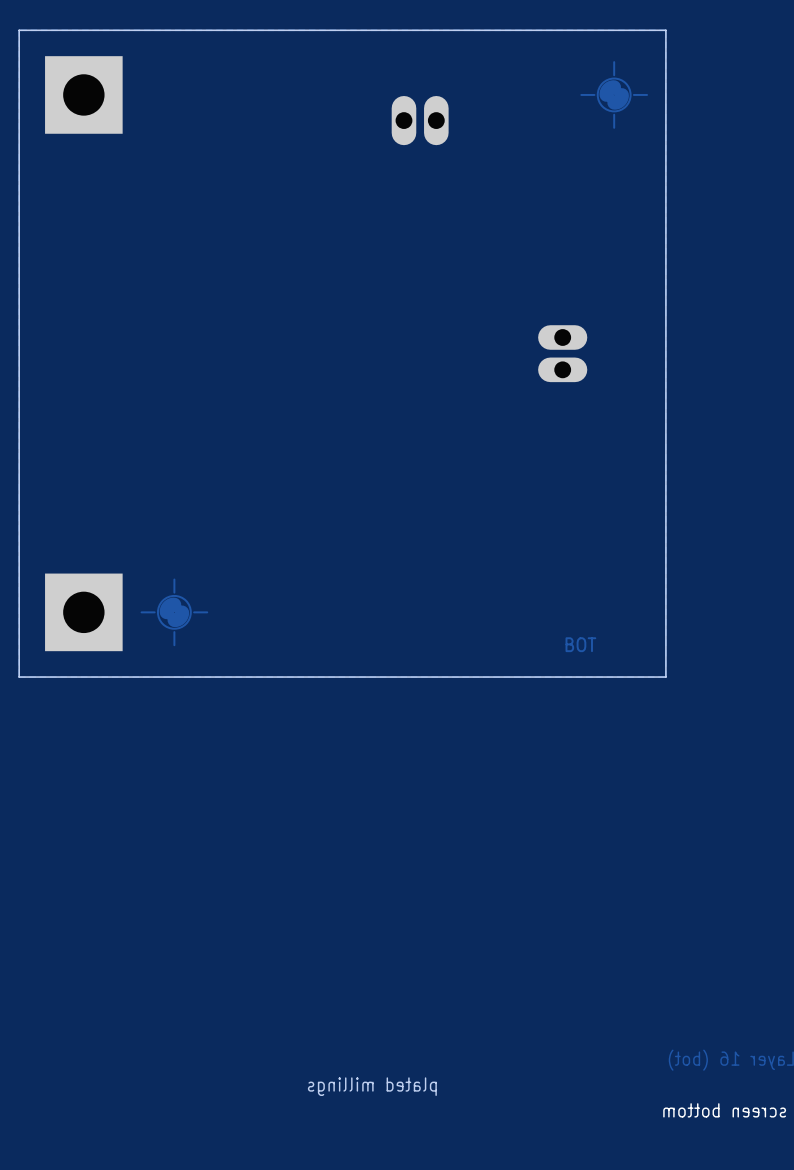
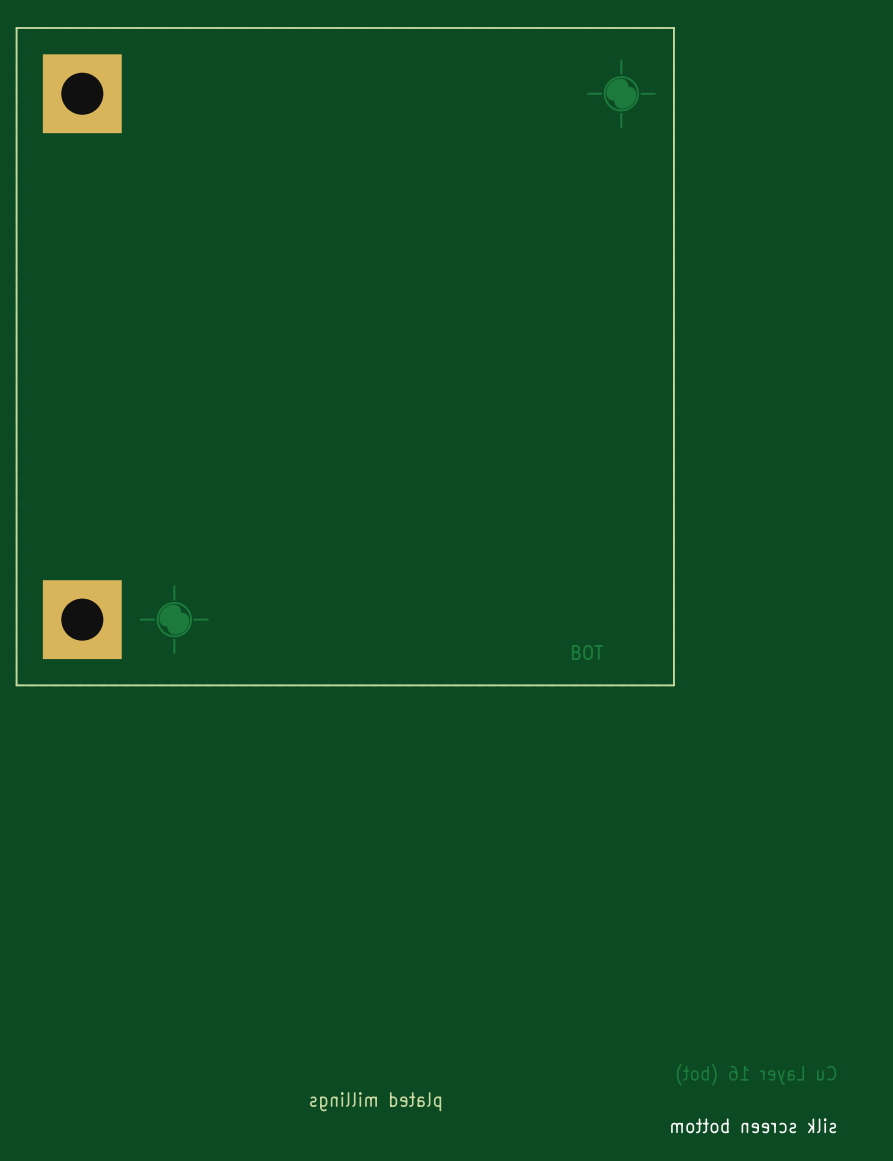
part: (420, 120) -> none
part: (562, 353) -> none

